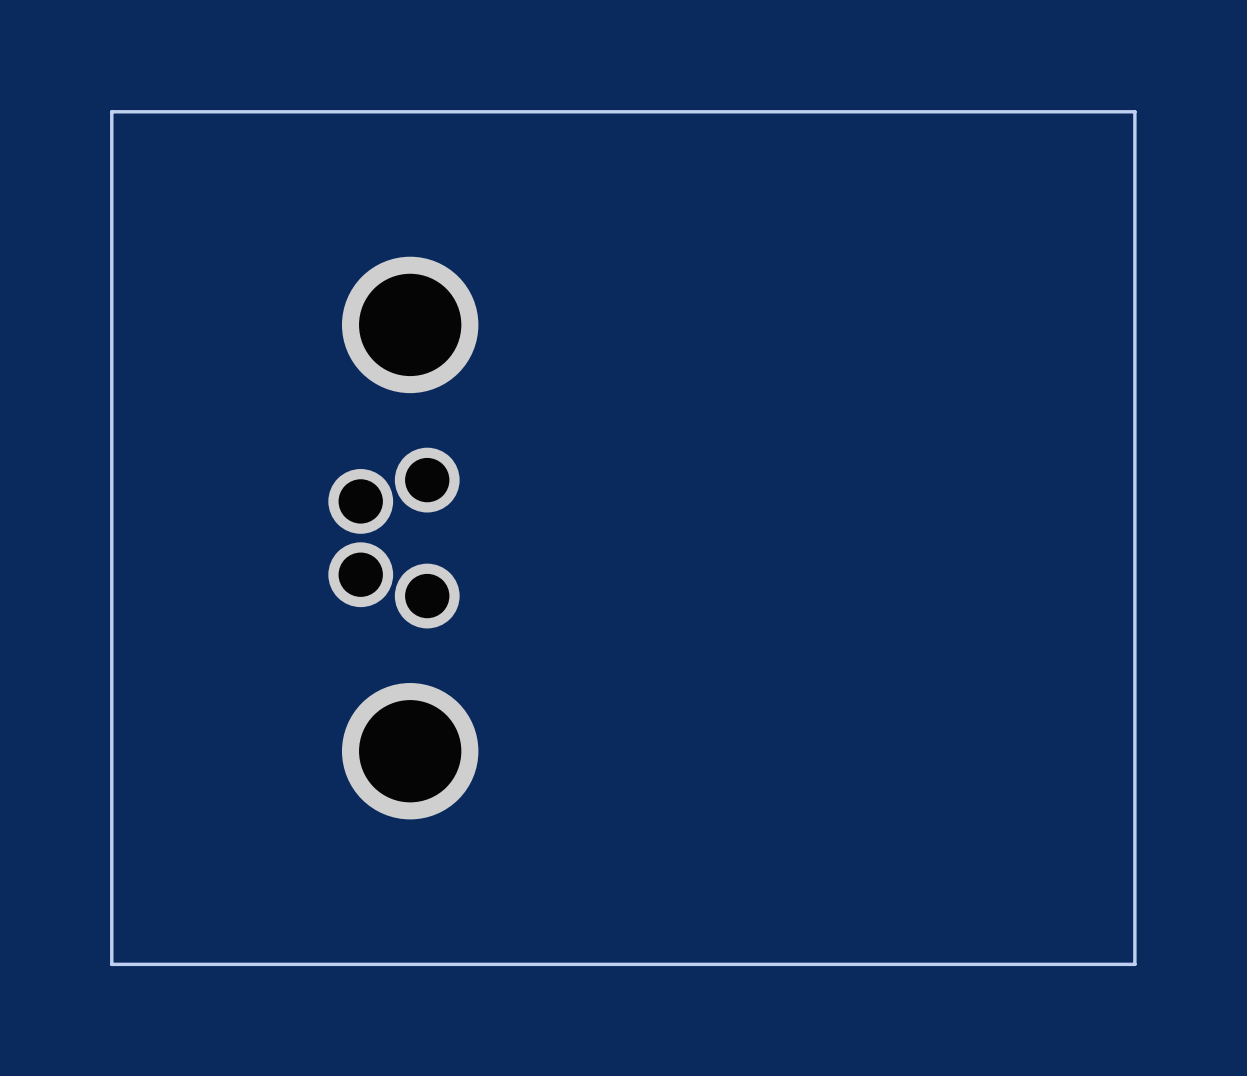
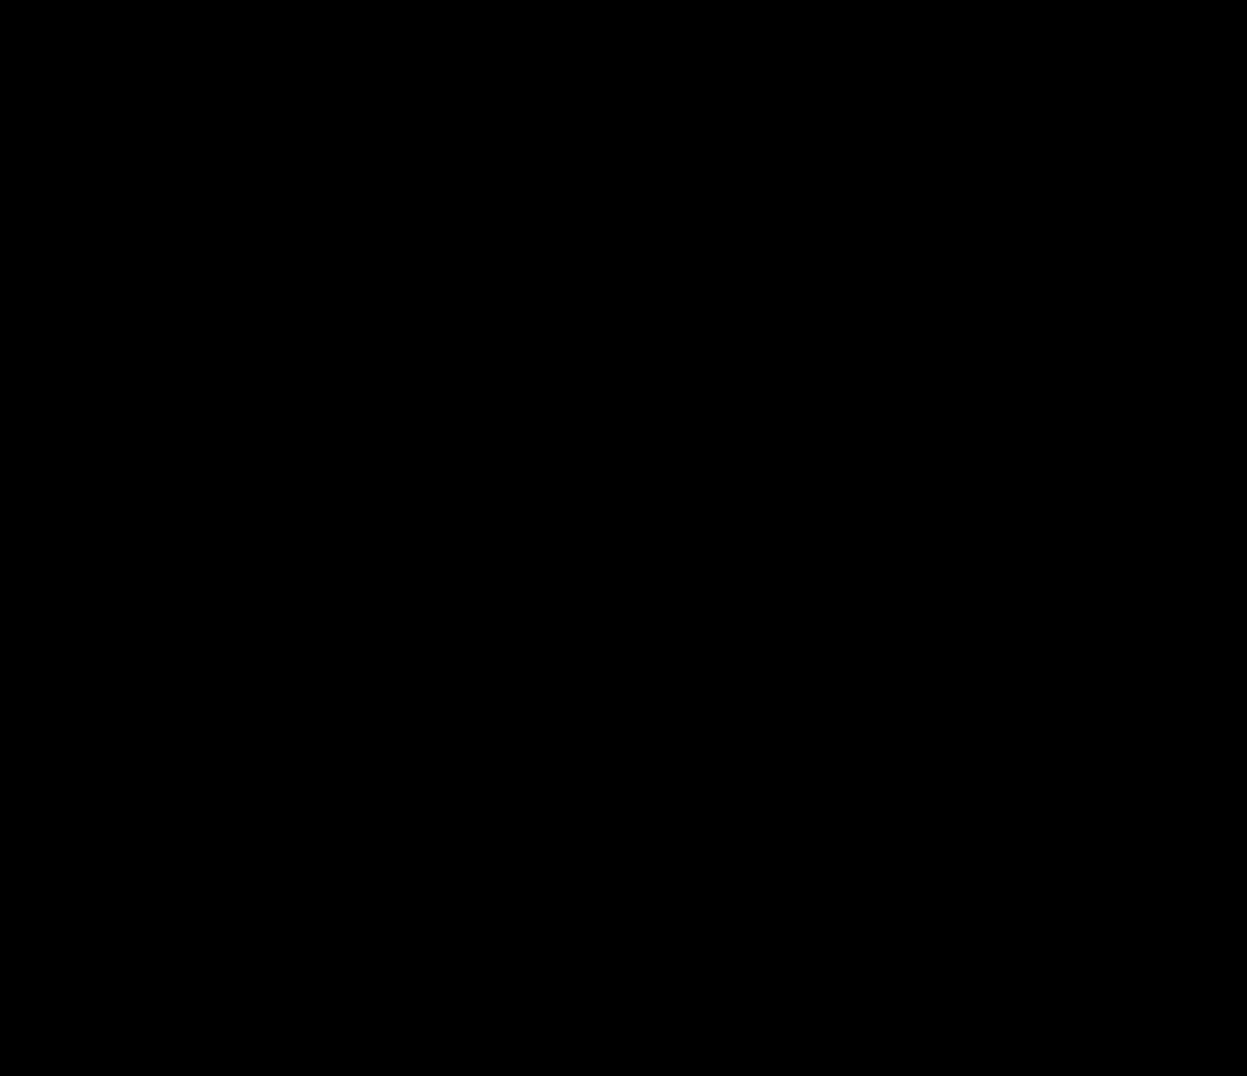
board edge: (1134, 111) (1134, 964) (111, 964) (111, 111) (1134, 111) -> none
part: (403, 538) -> none

